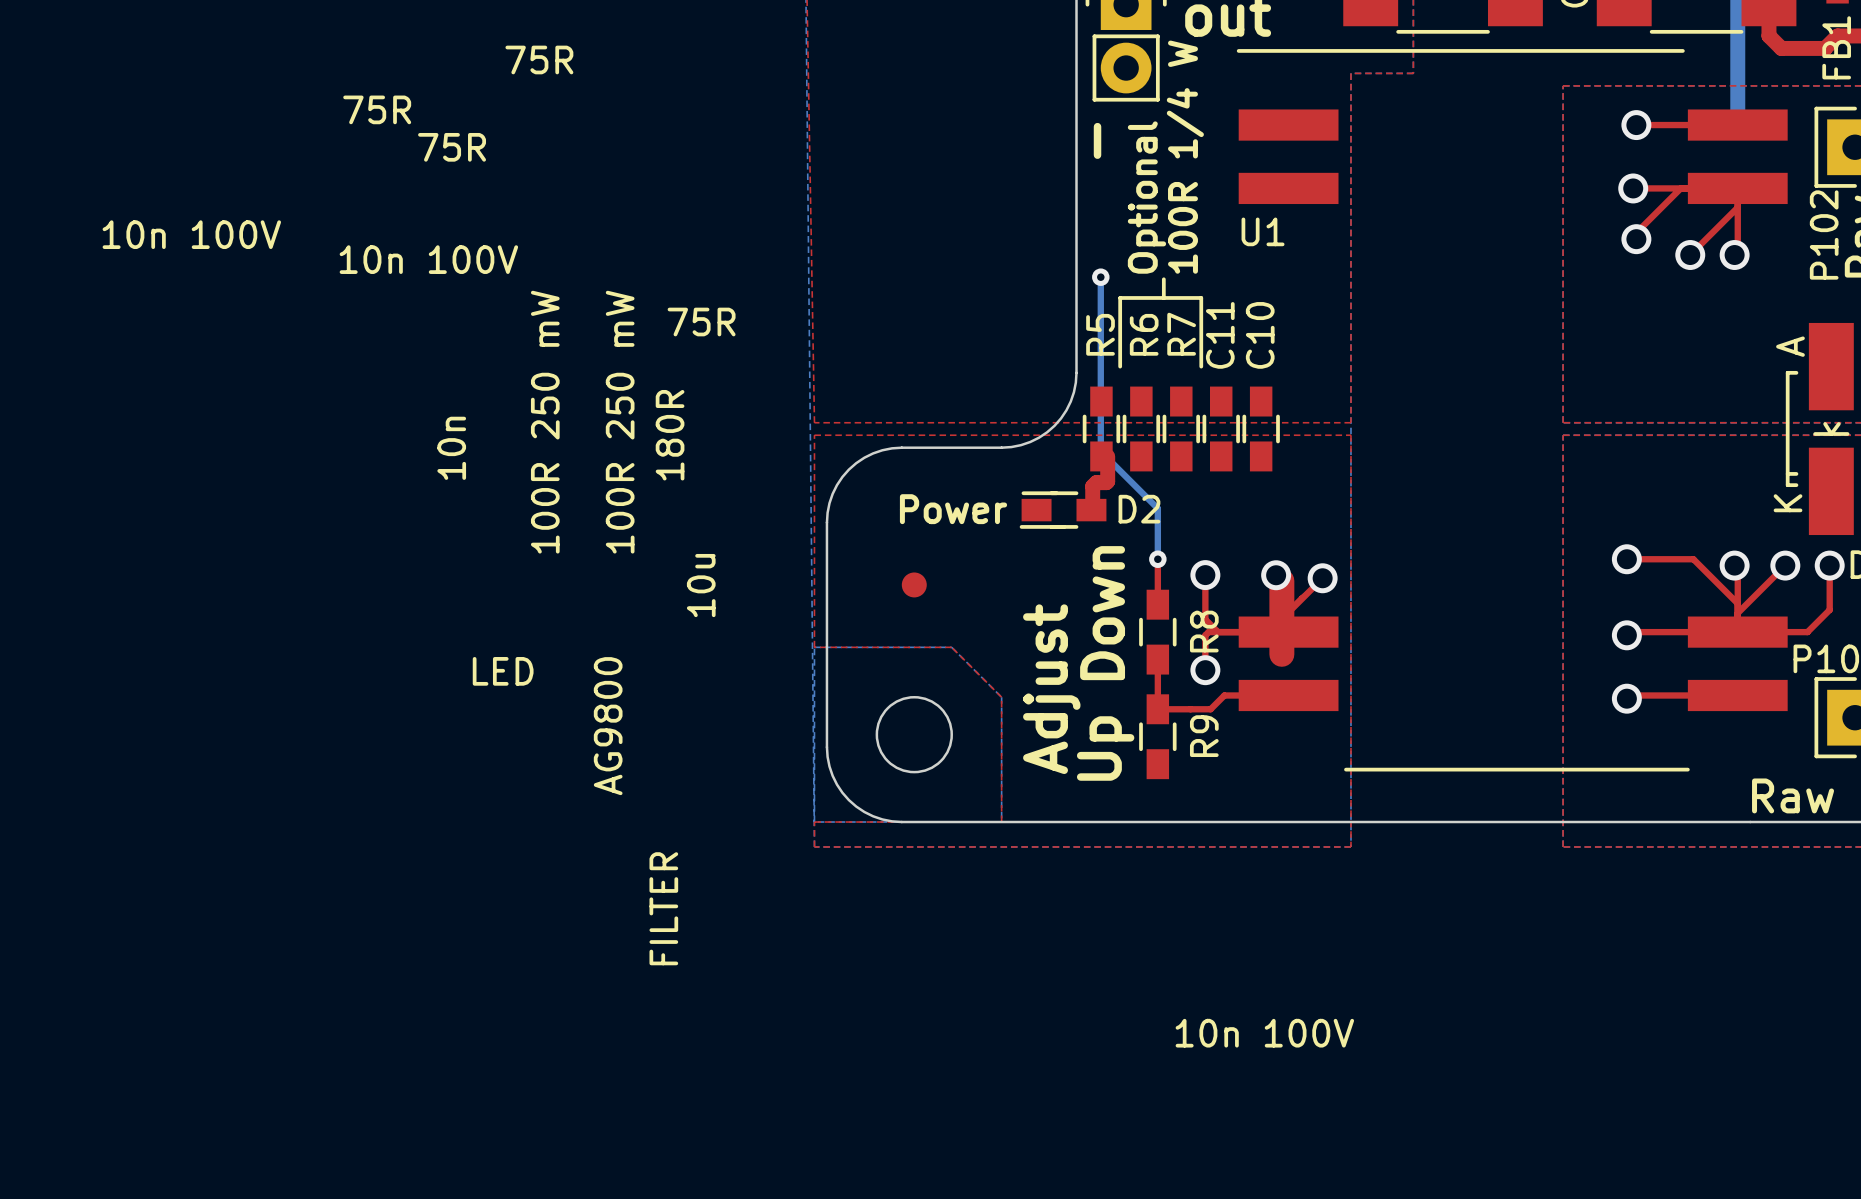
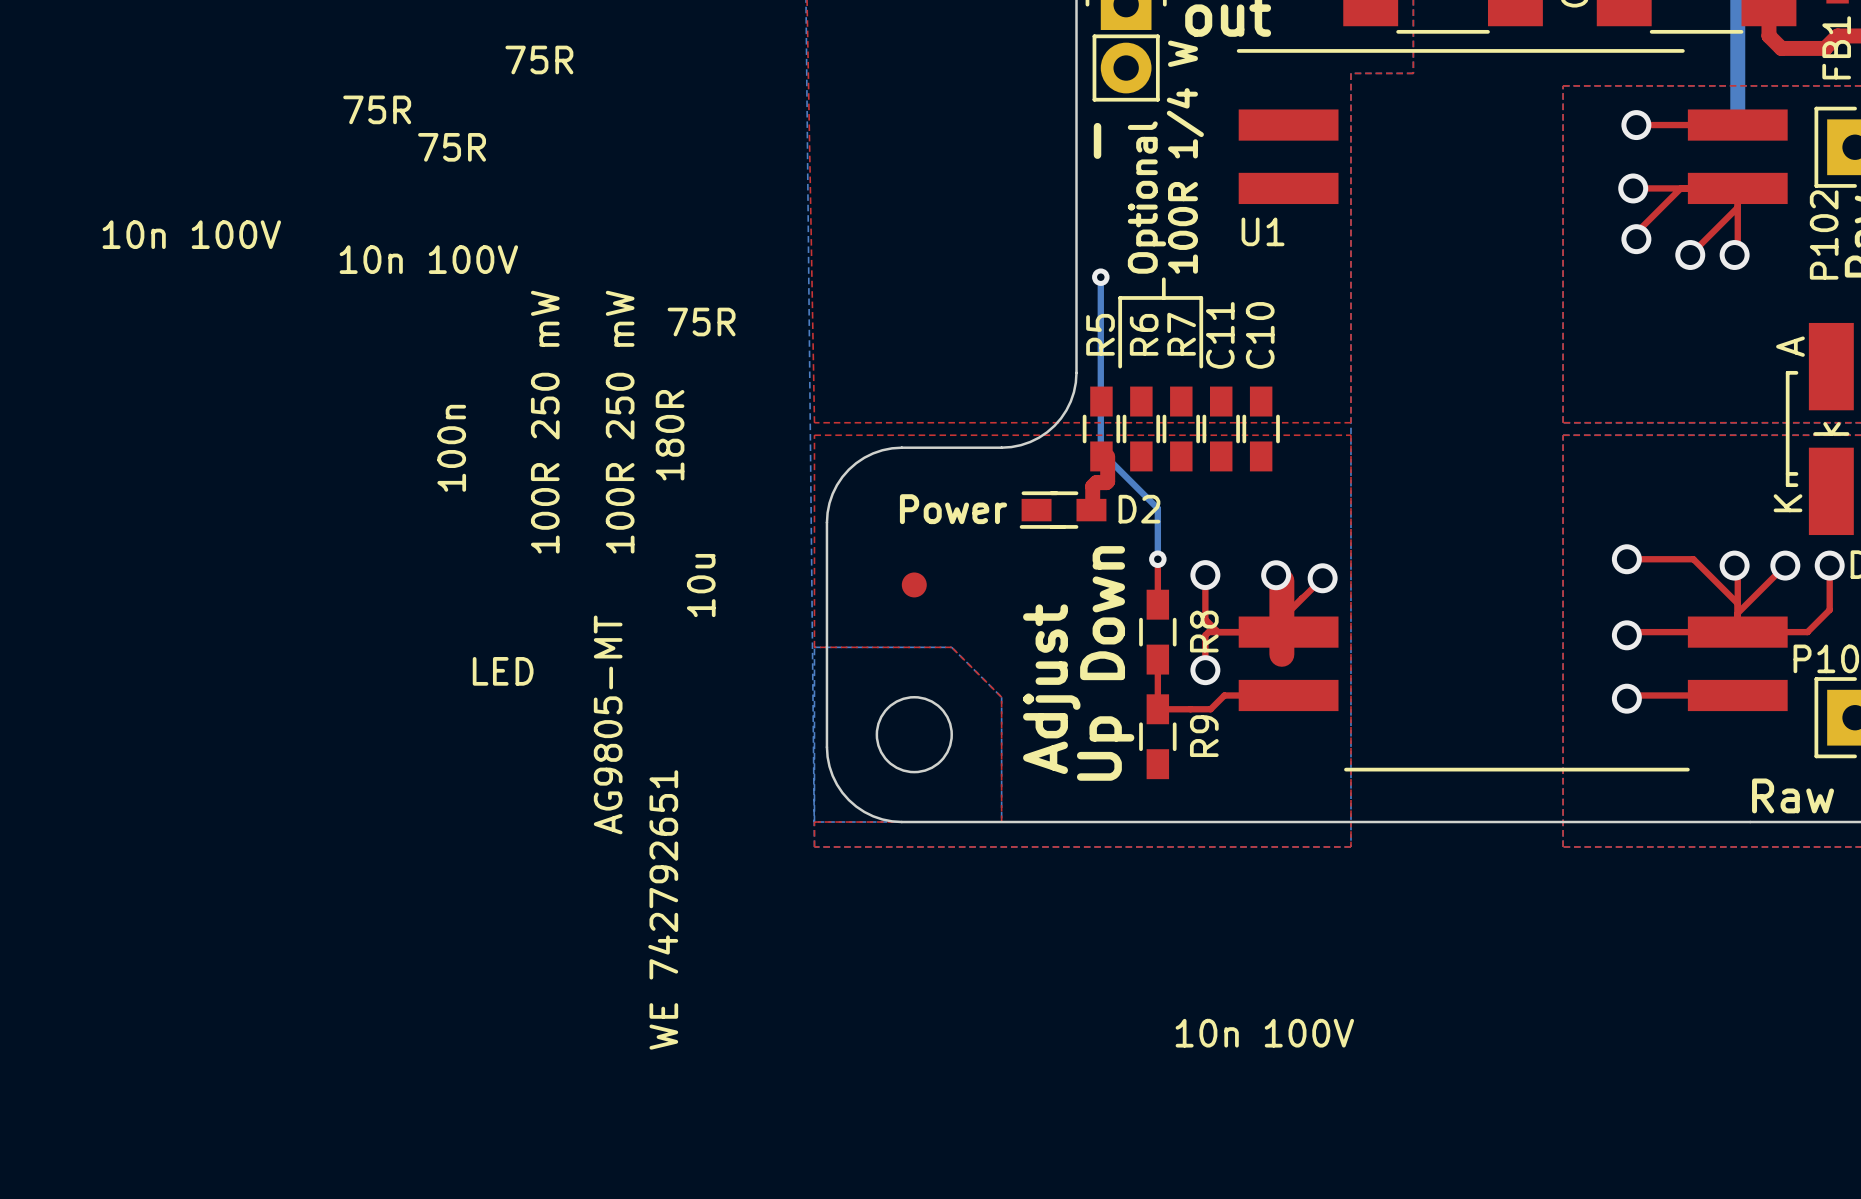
C10 value: 10n (451, 448) -> 100n (451, 448)
U1 value: AG9800 (608, 726) -> AG9805-MT (608, 724)
FB1 value: FILTER (663, 908) -> WE 742792651 (663, 909)

